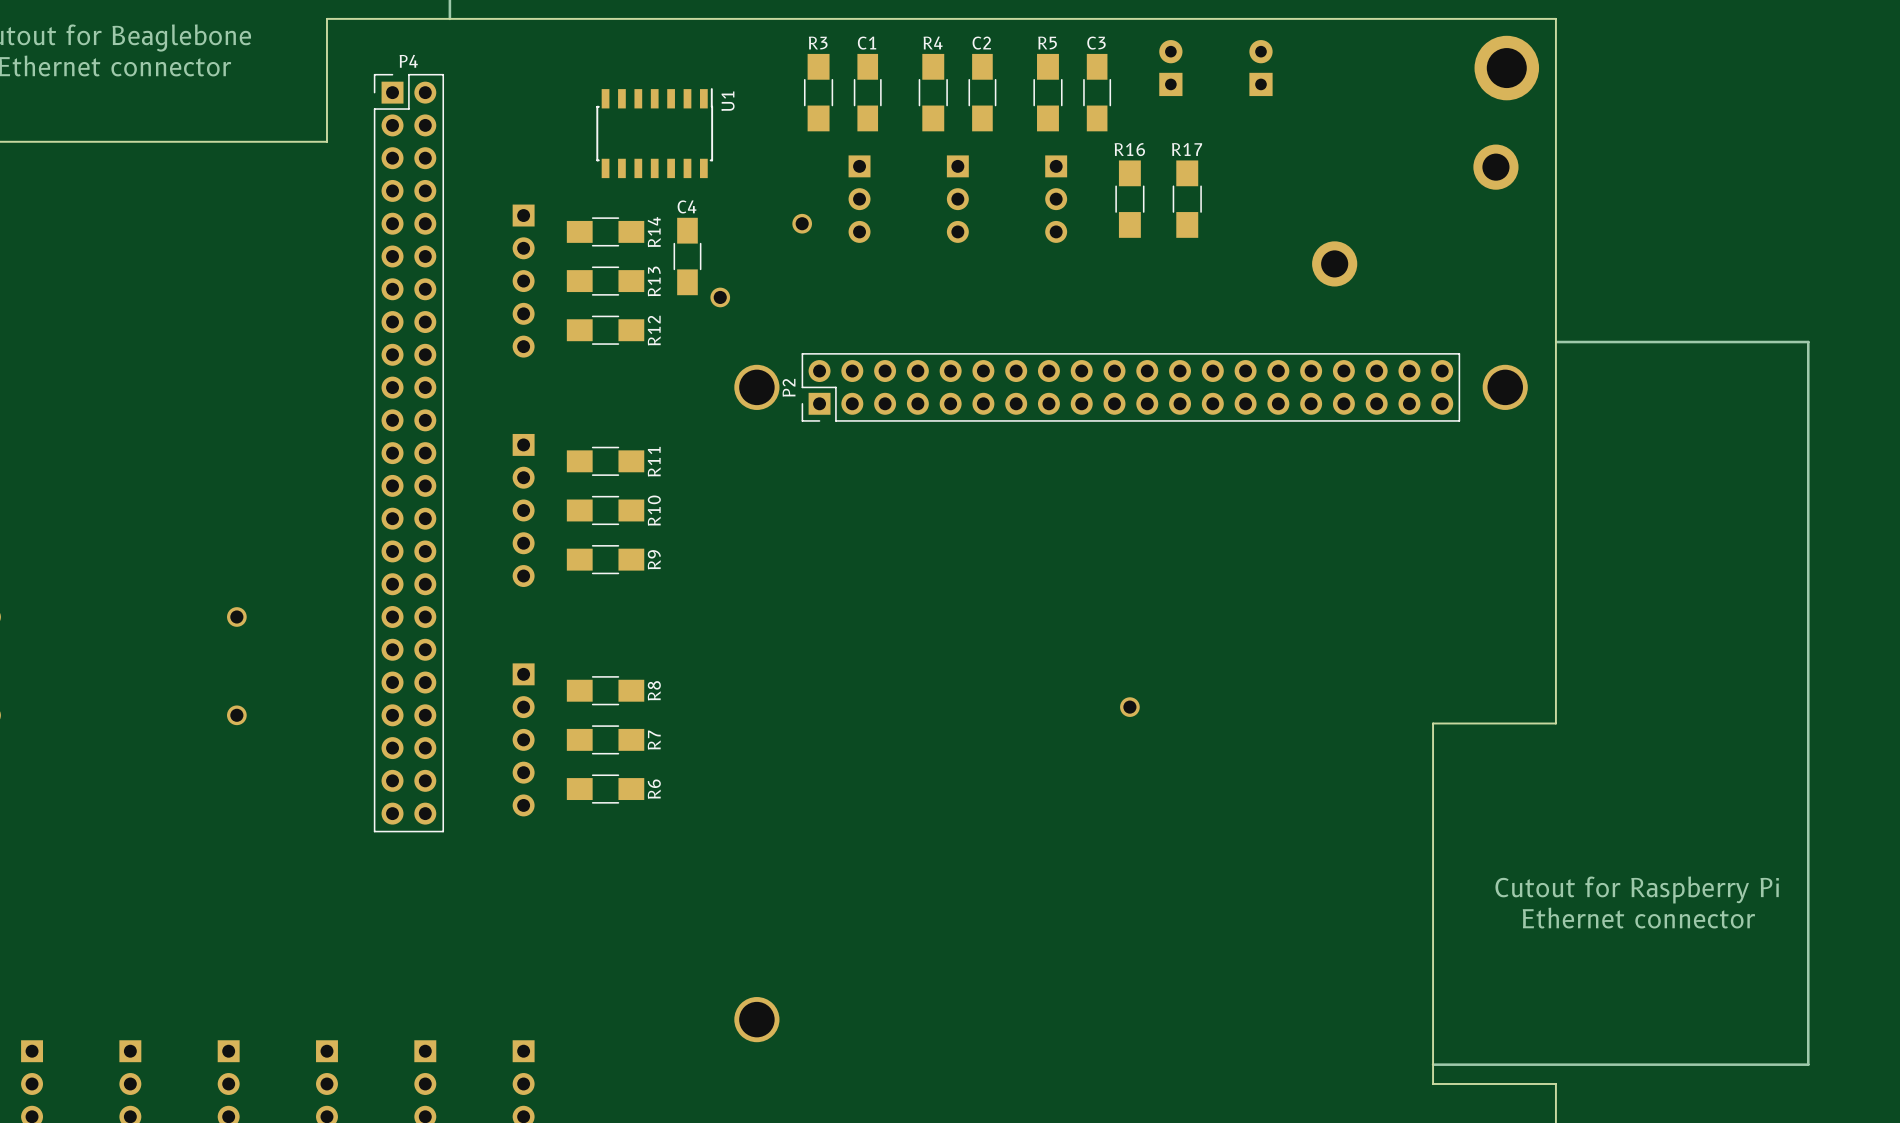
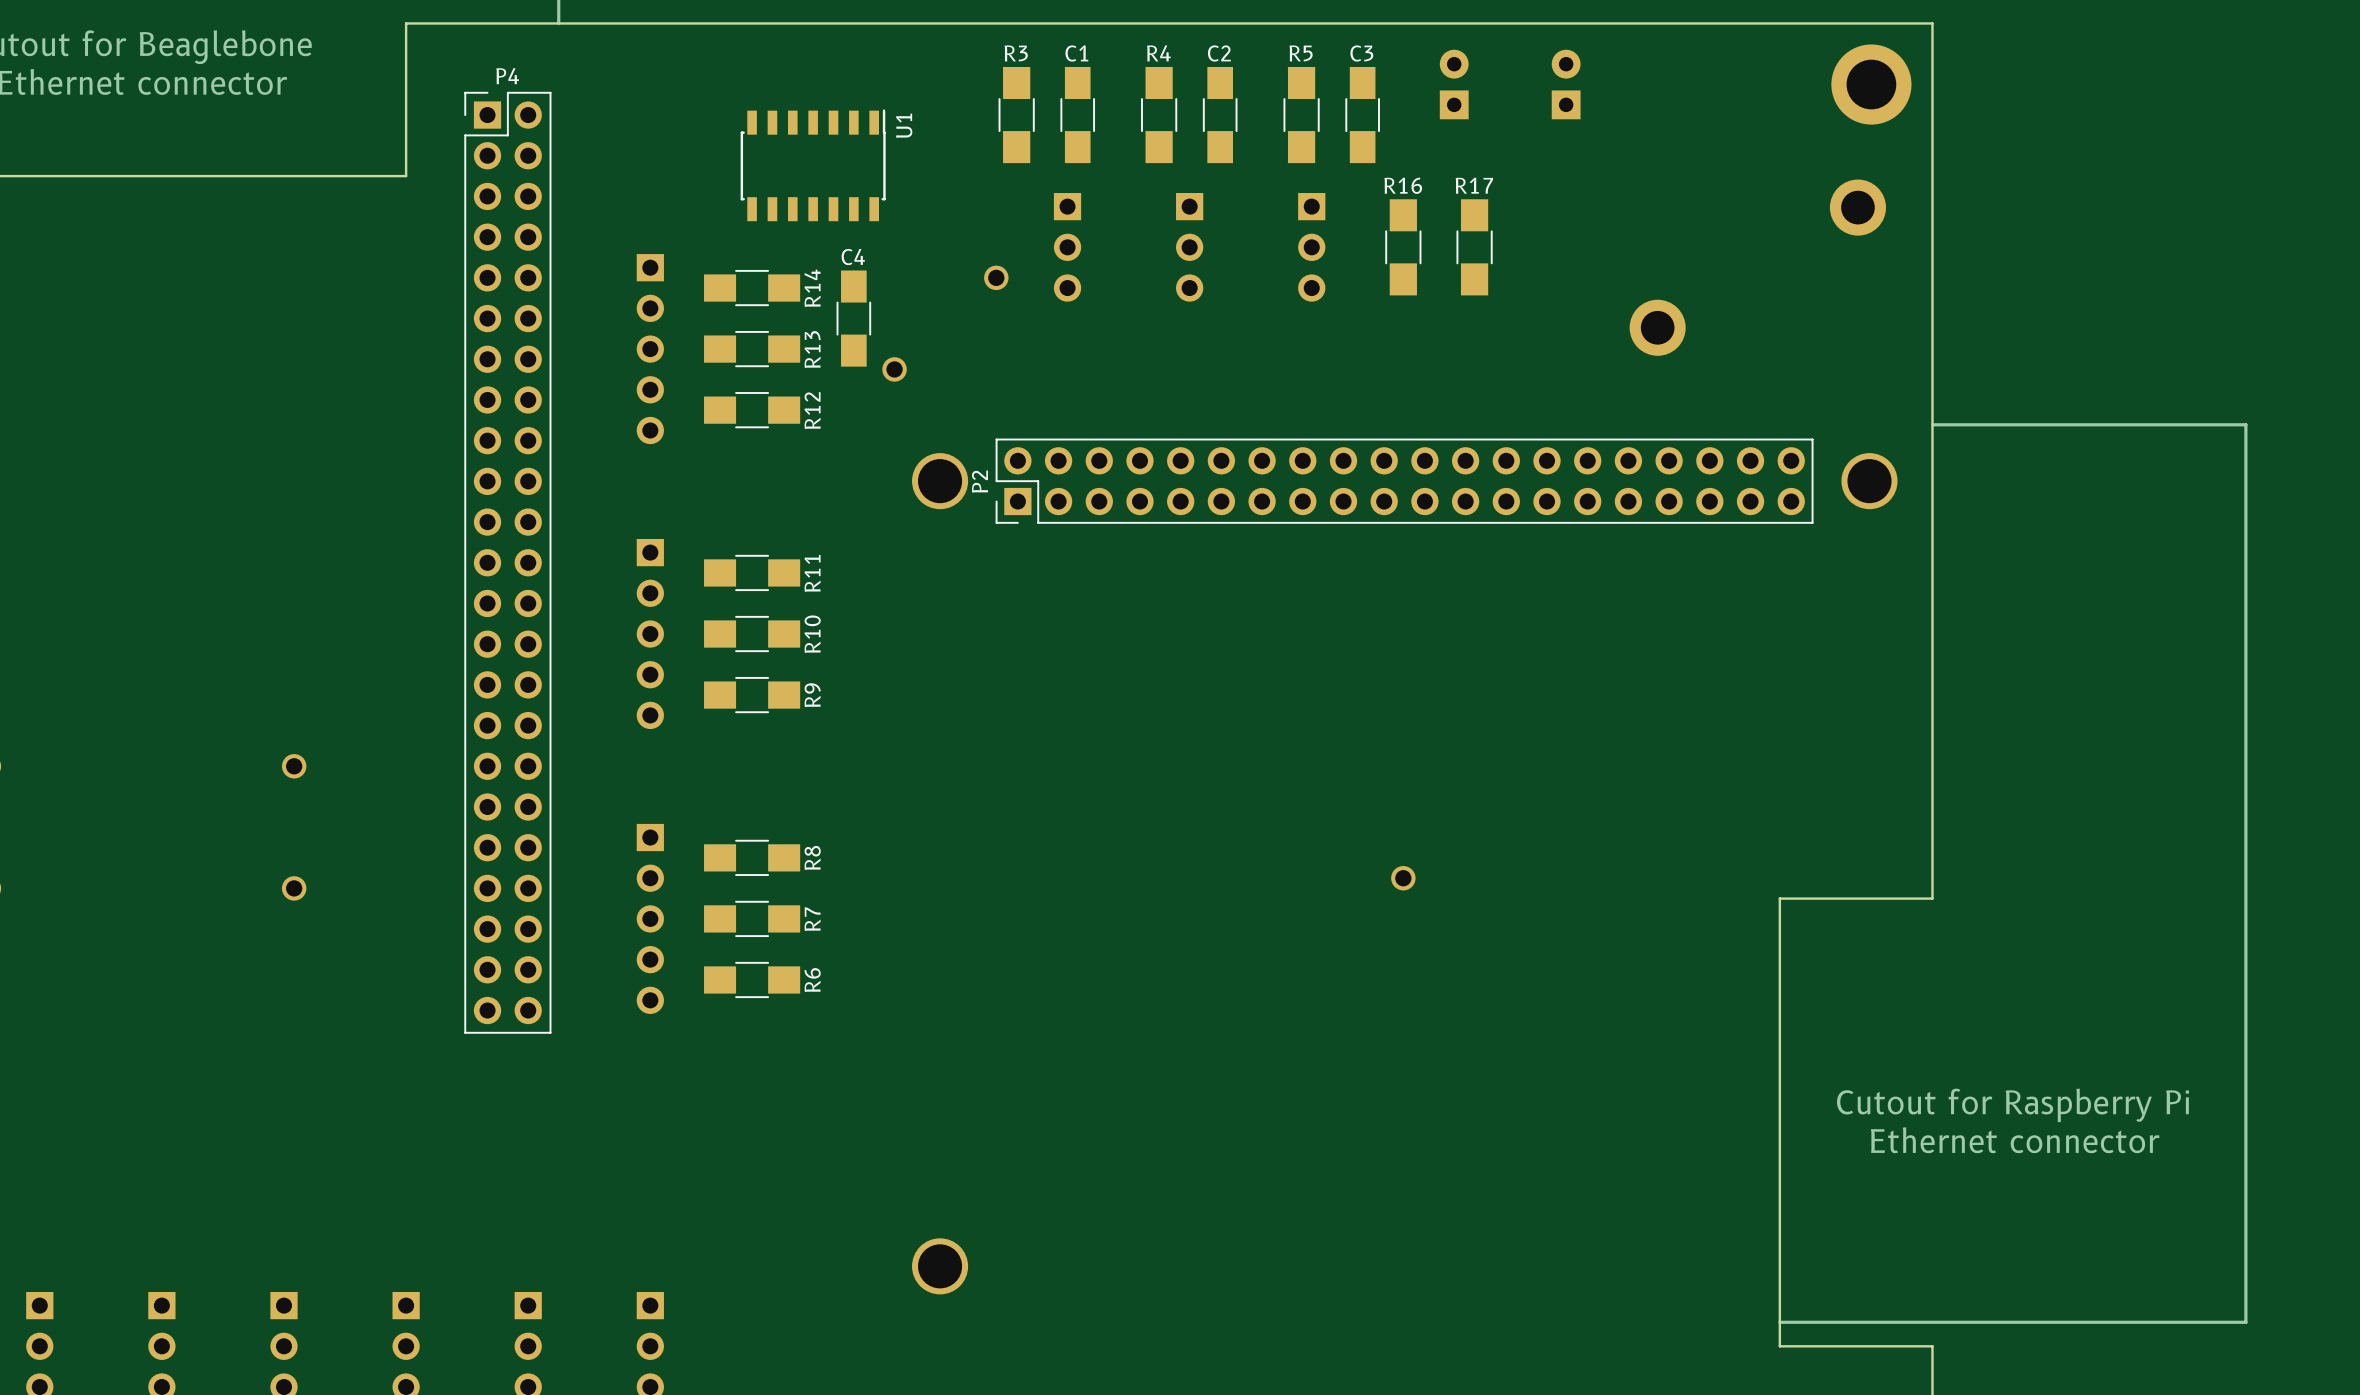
text position: Cutout for Raspberry Pi (1637, 889) -> Cutout for Raspberry Pi (2012, 1105)
text position: Ethernet connector (1638, 918) -> Ethernet connector (2015, 1140)

